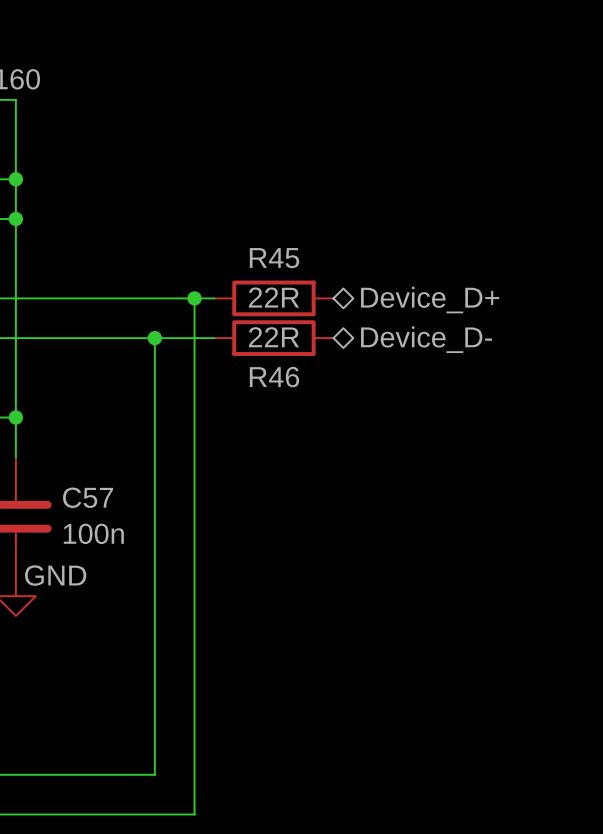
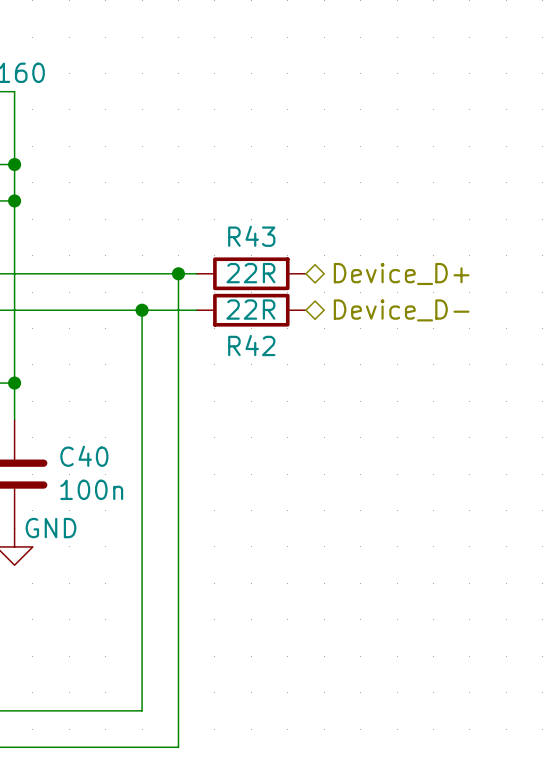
R45 name: R45 (274, 258) -> R43 (251, 236)
R46 name: R46 (274, 377) -> R42 (251, 345)
C57 name: C57 (88, 497) -> C40 (84, 456)

